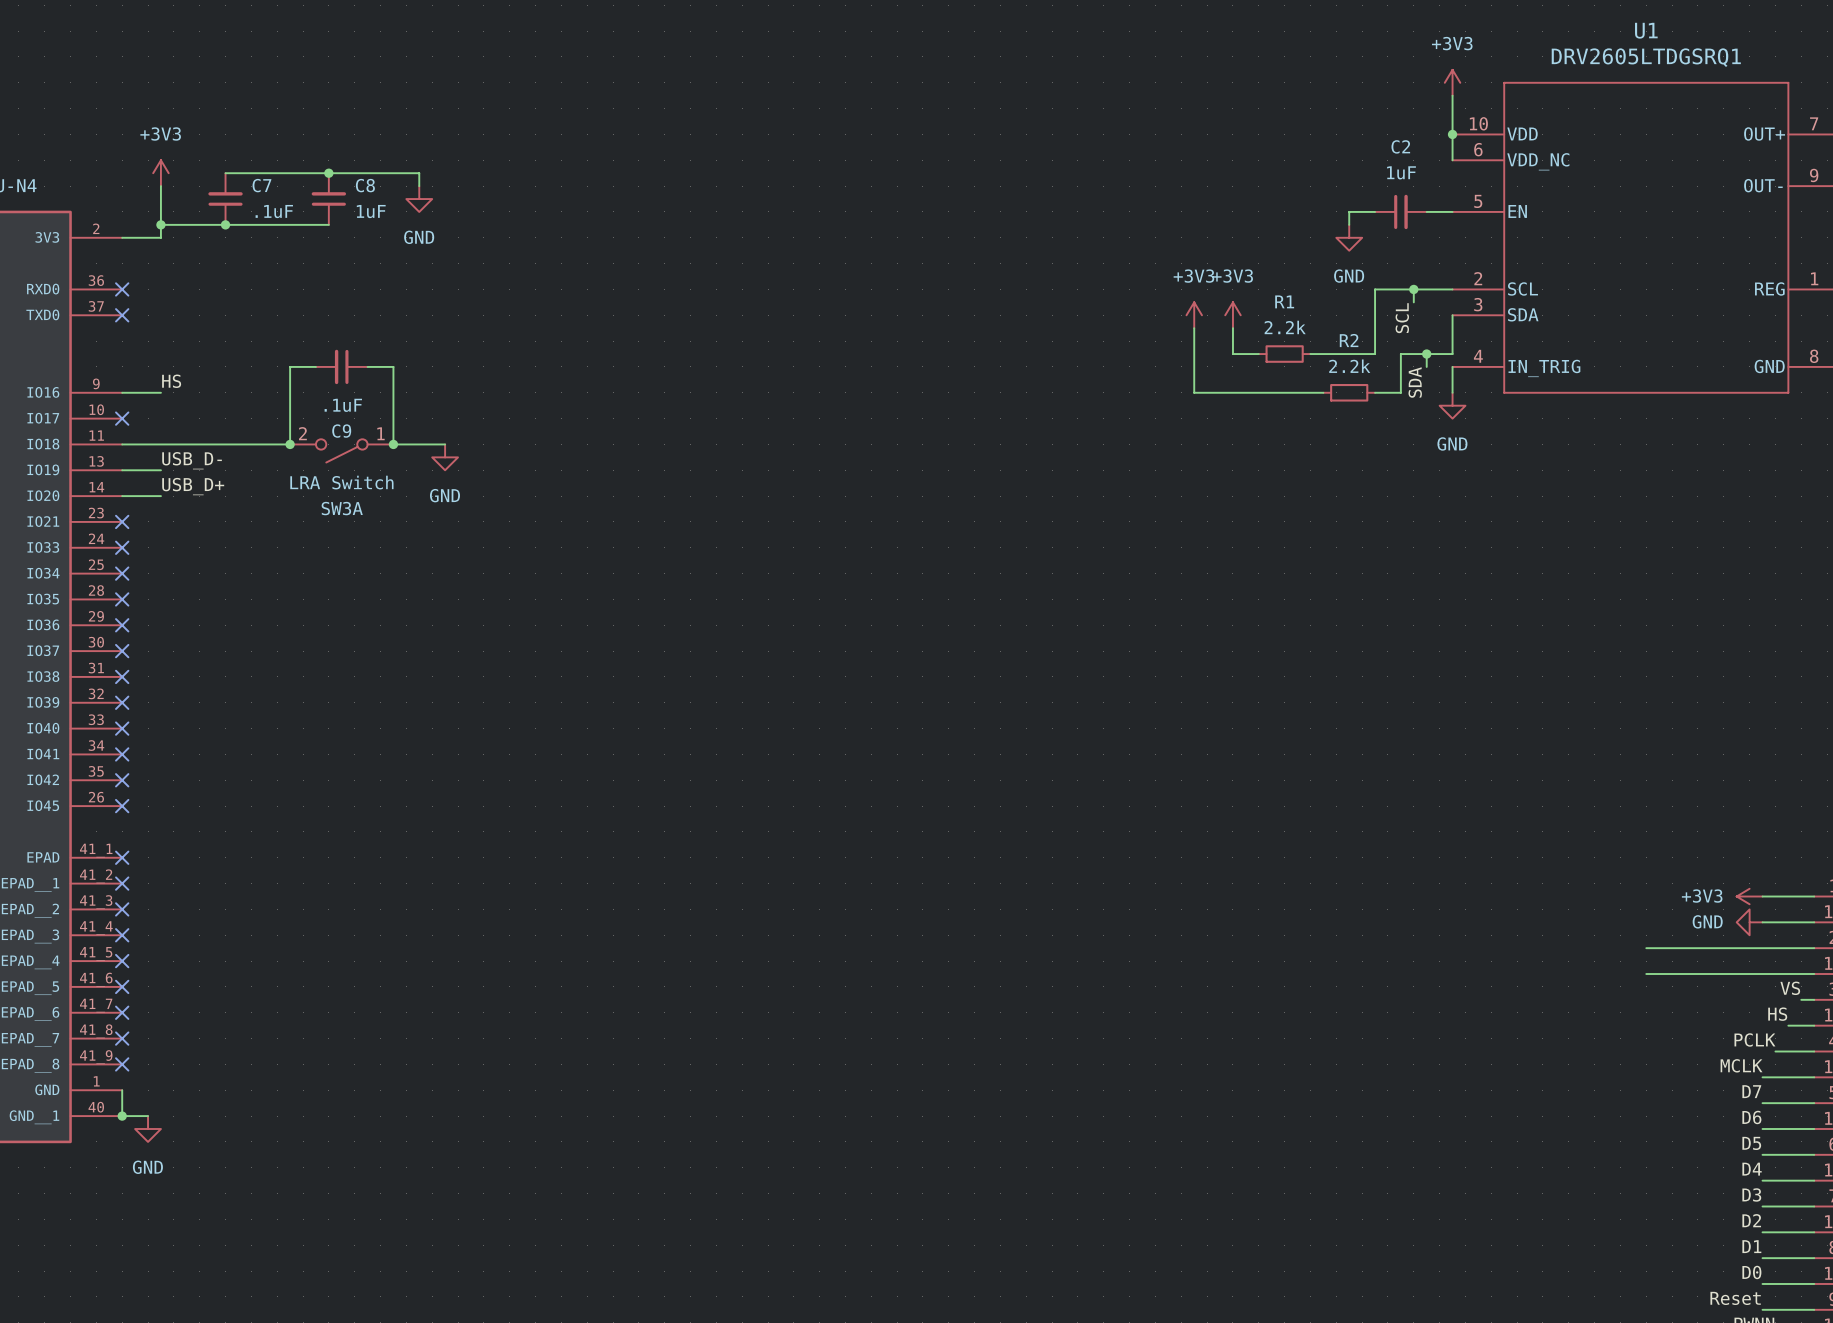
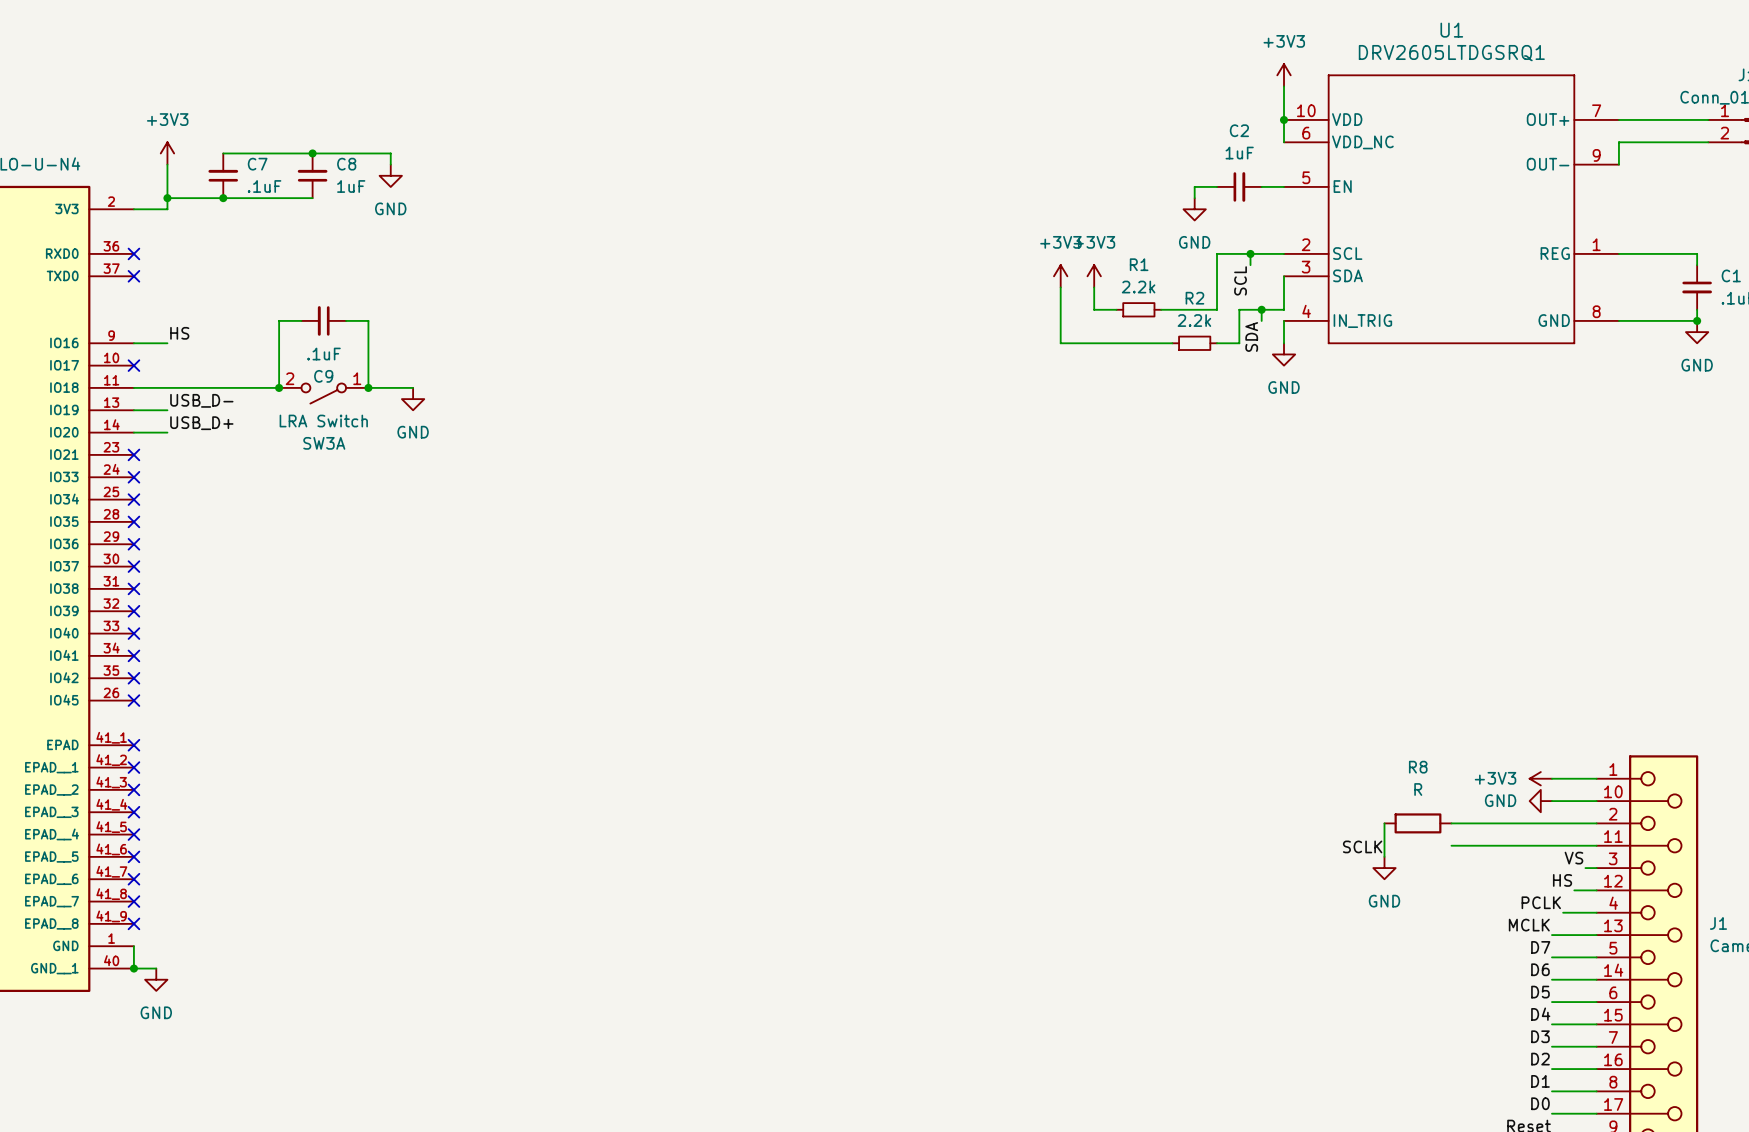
wire: none -> (1384, 823) (1384, 856)
R8: none -> R (1417, 823)
label: none -> SCLK (1362, 846)
power symbol: none -> GND (1384, 868)

